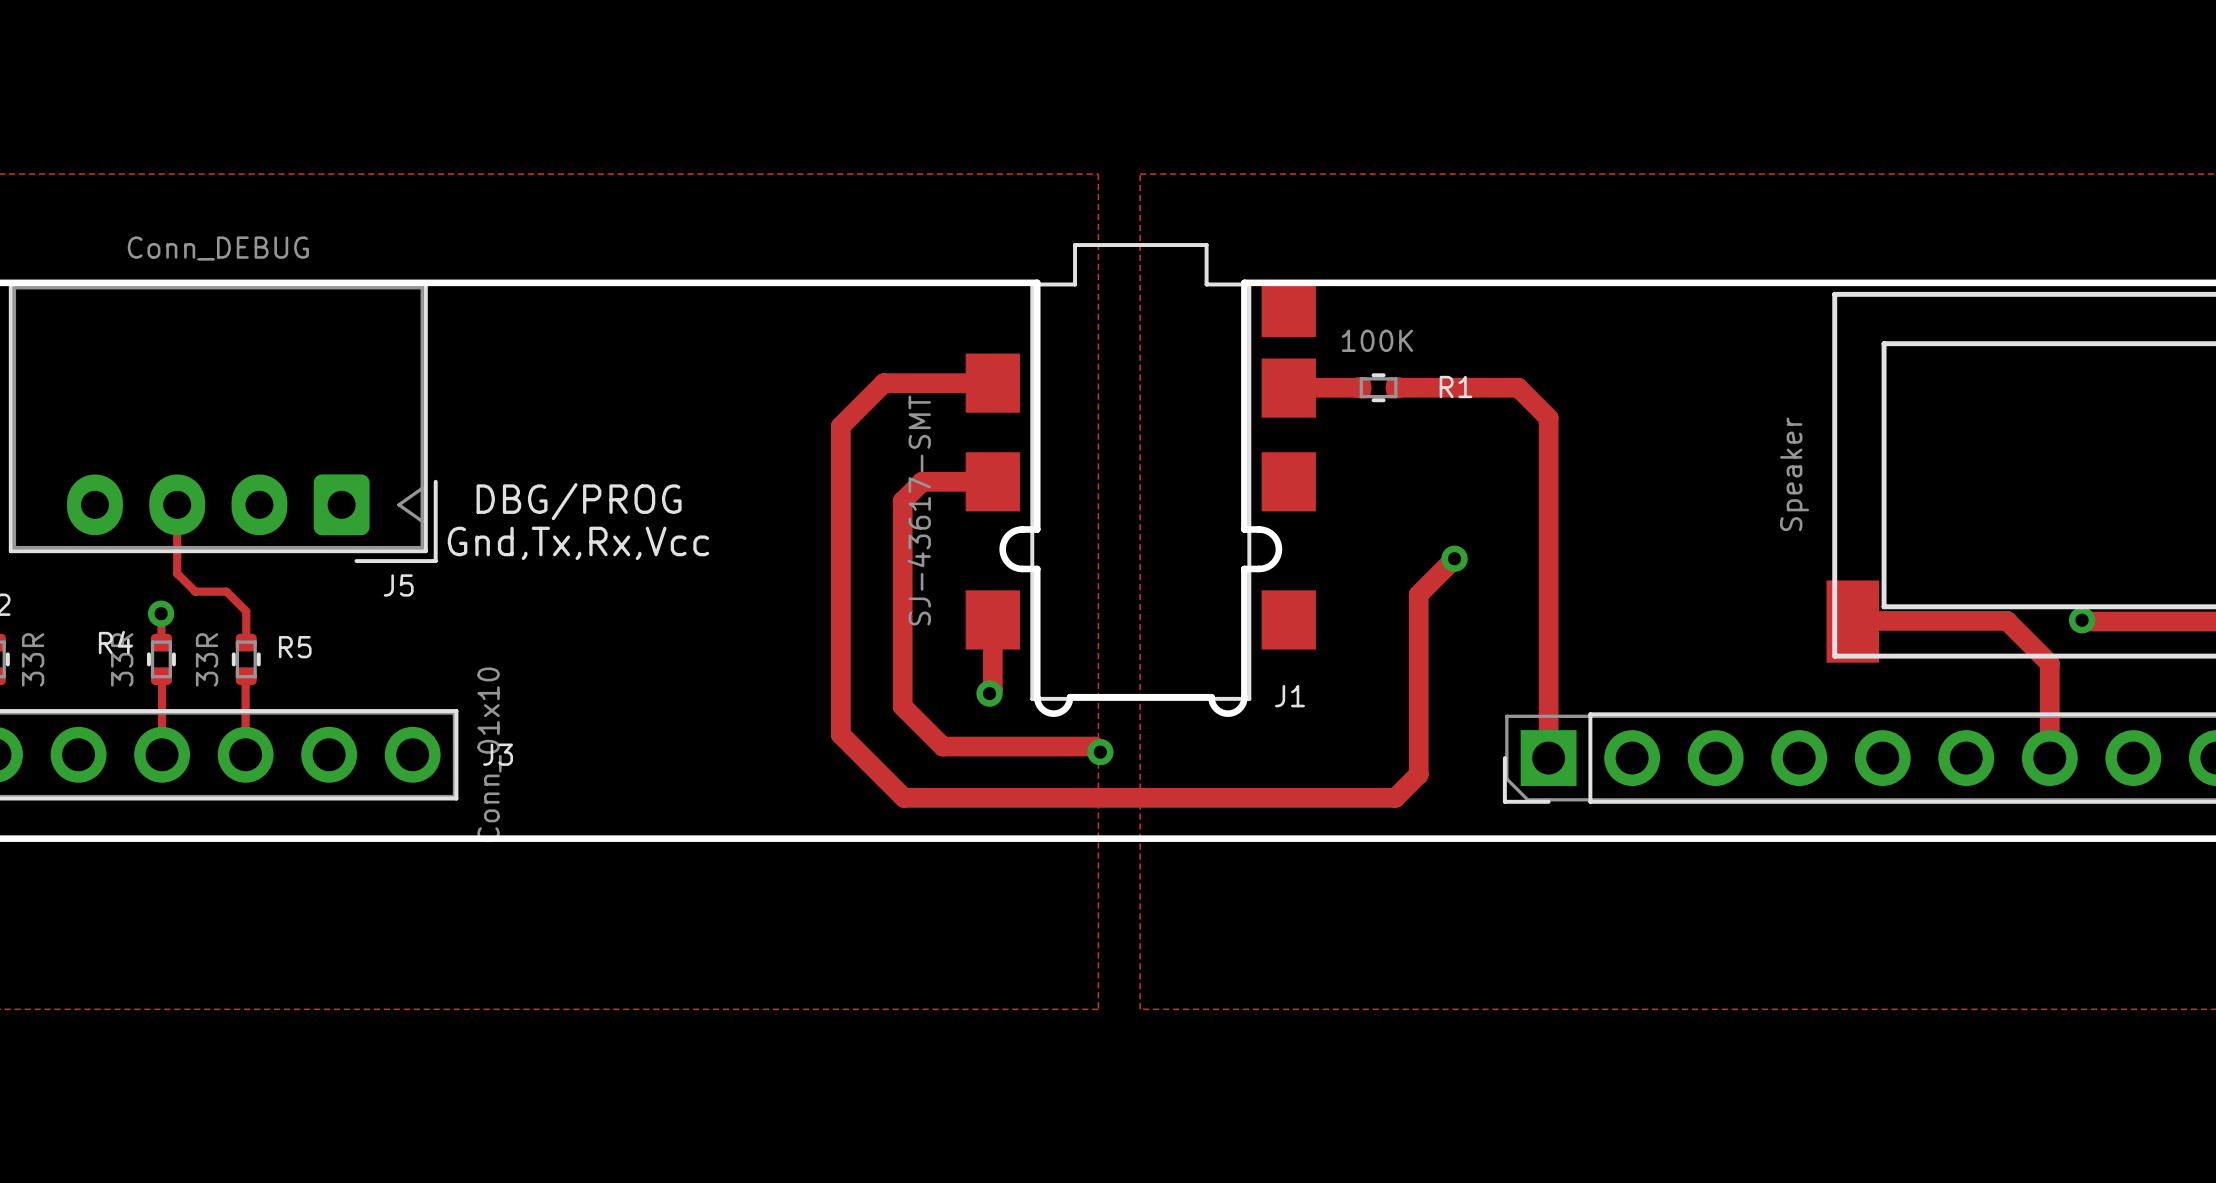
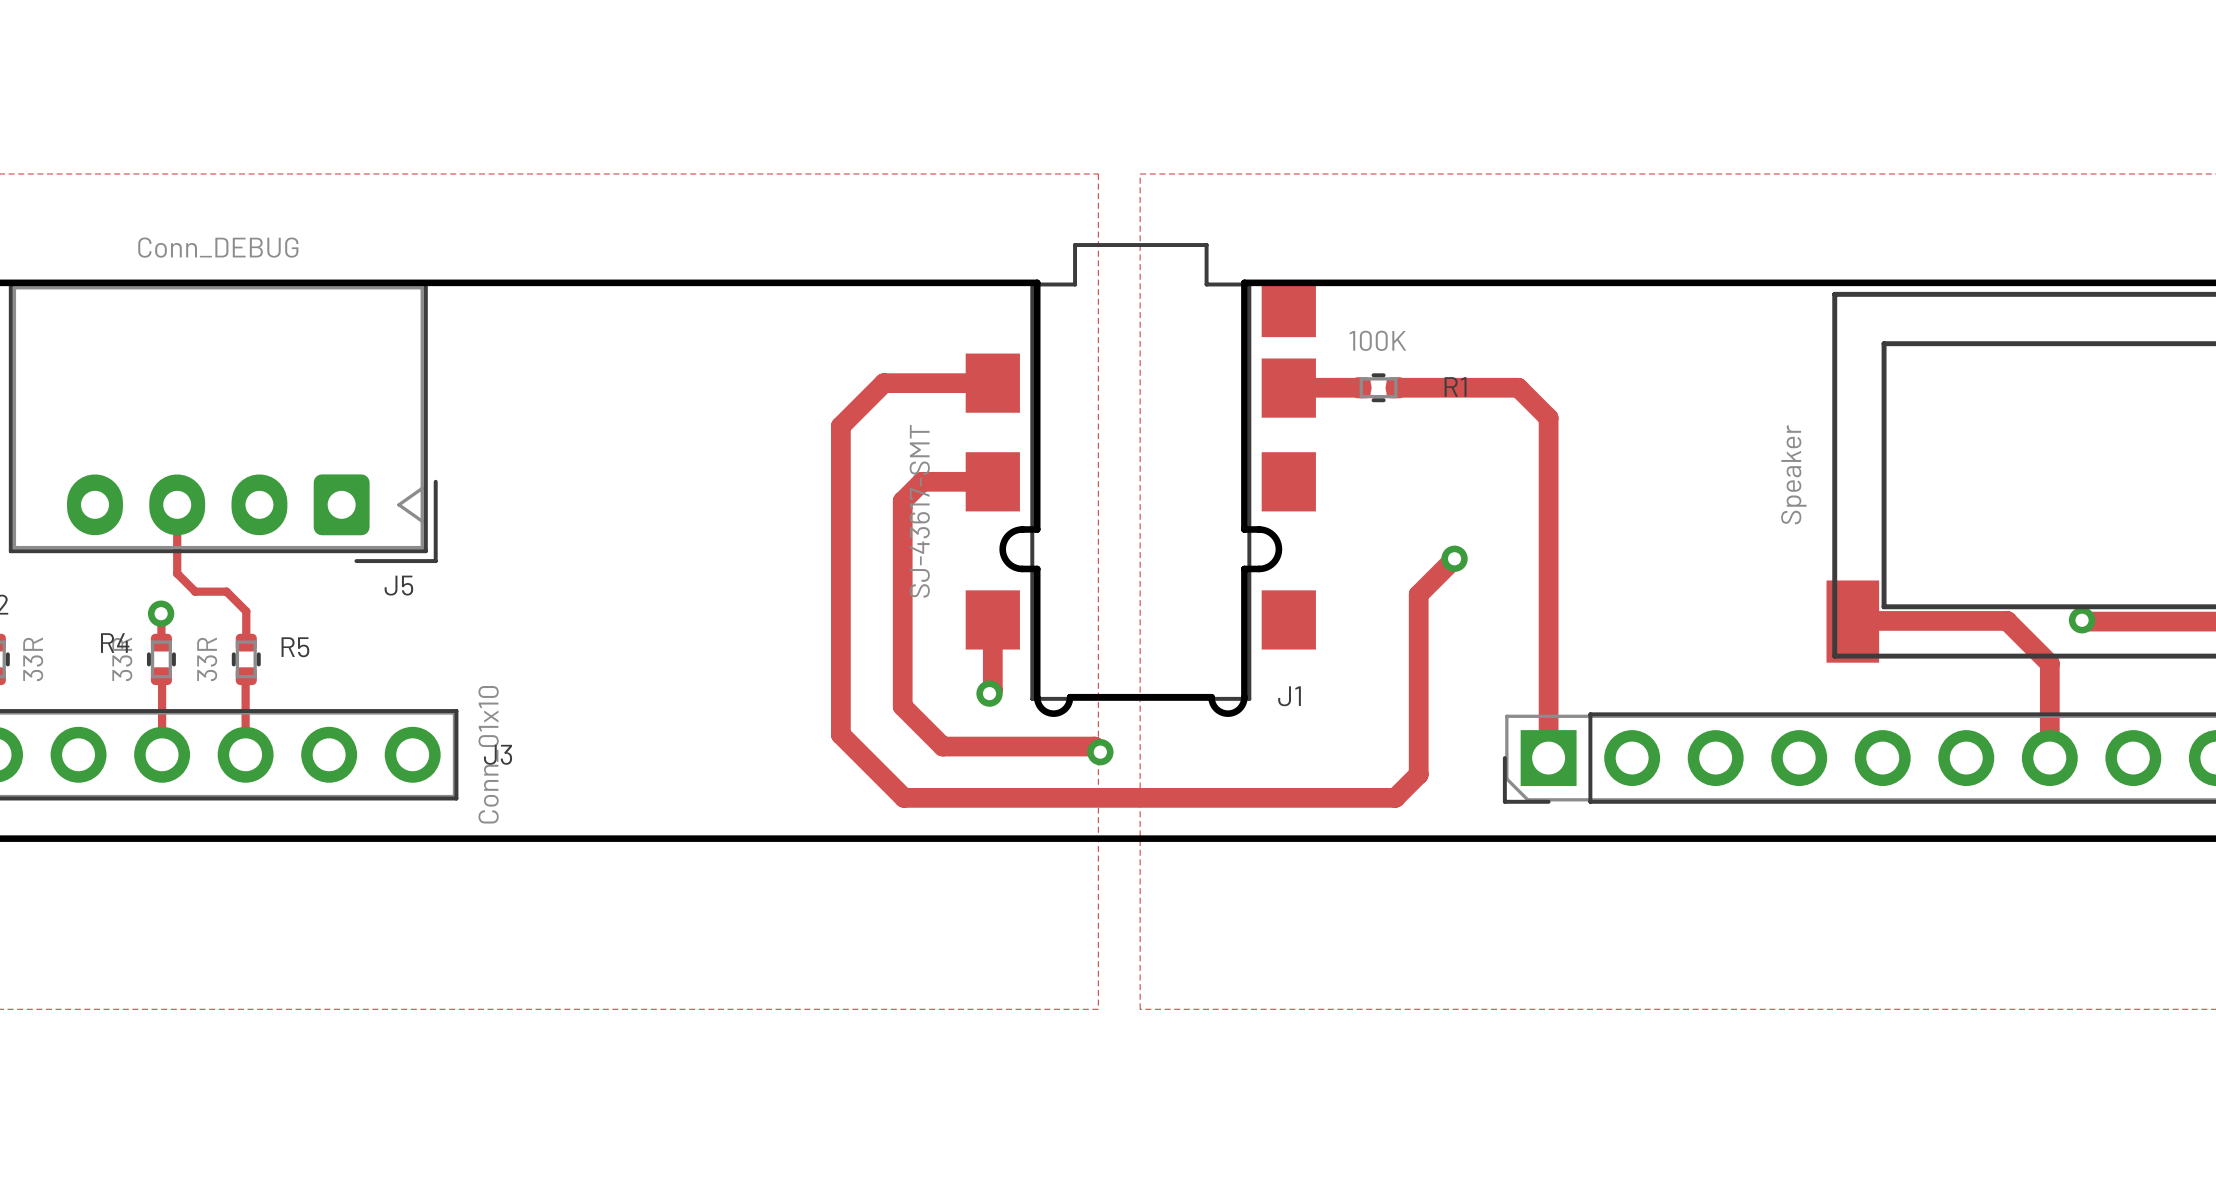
text: DBG/PROG (579, 501) -> none
text: Gnd,Tx,Rx,Vcc (578, 543) -> none

